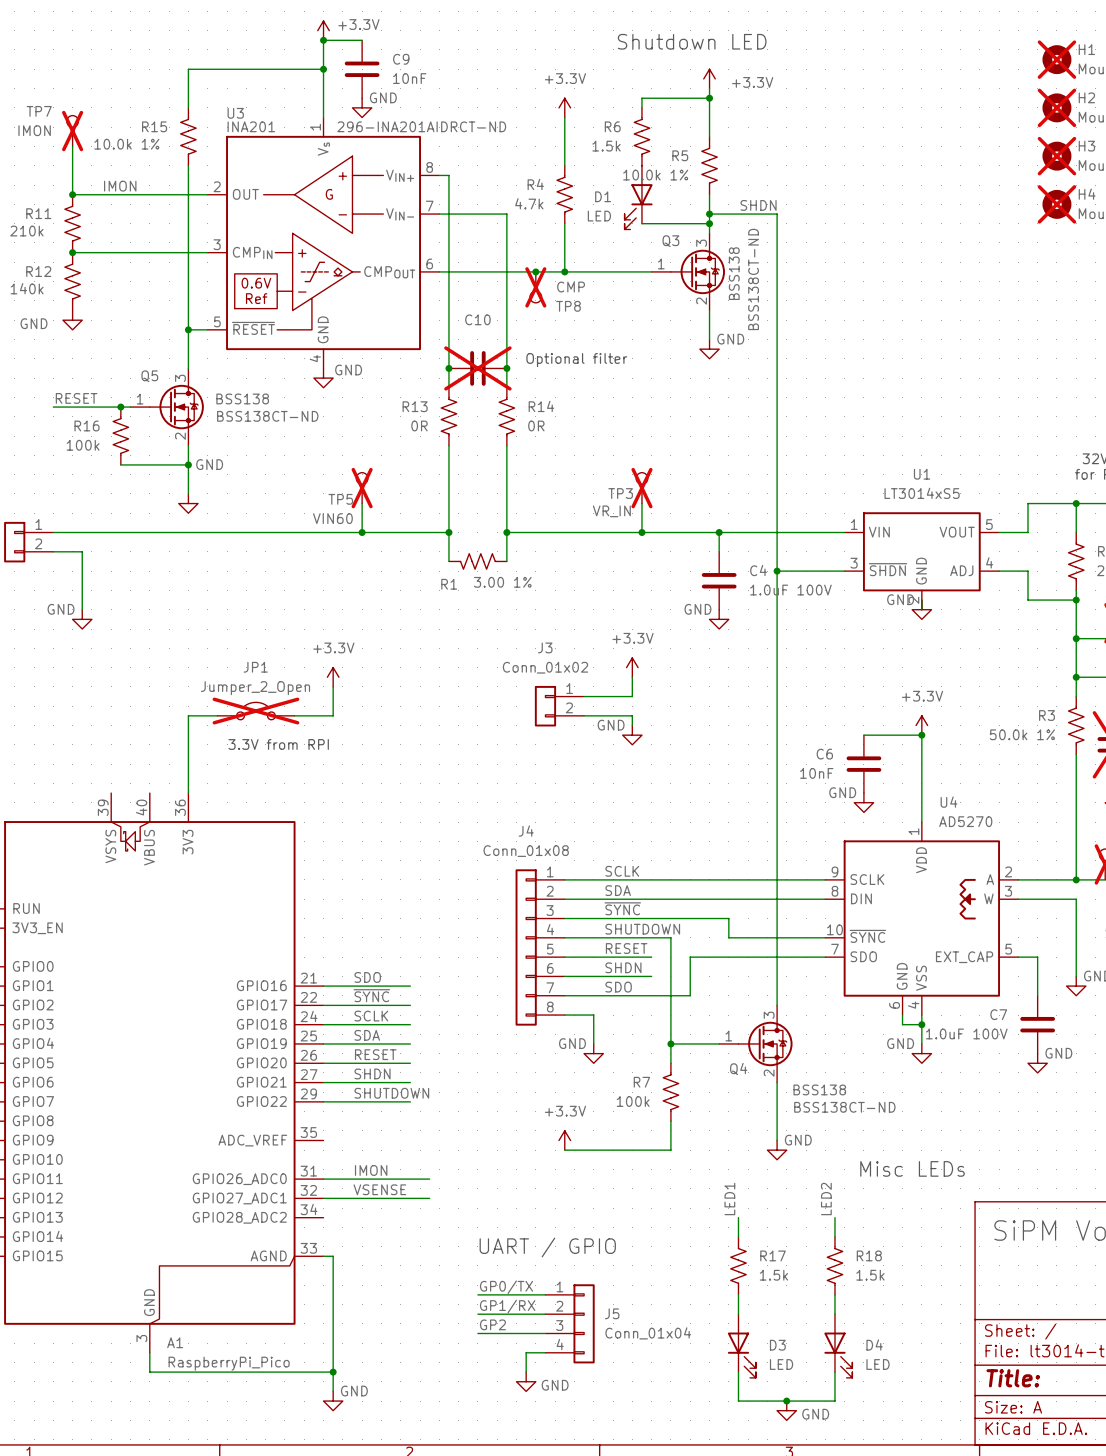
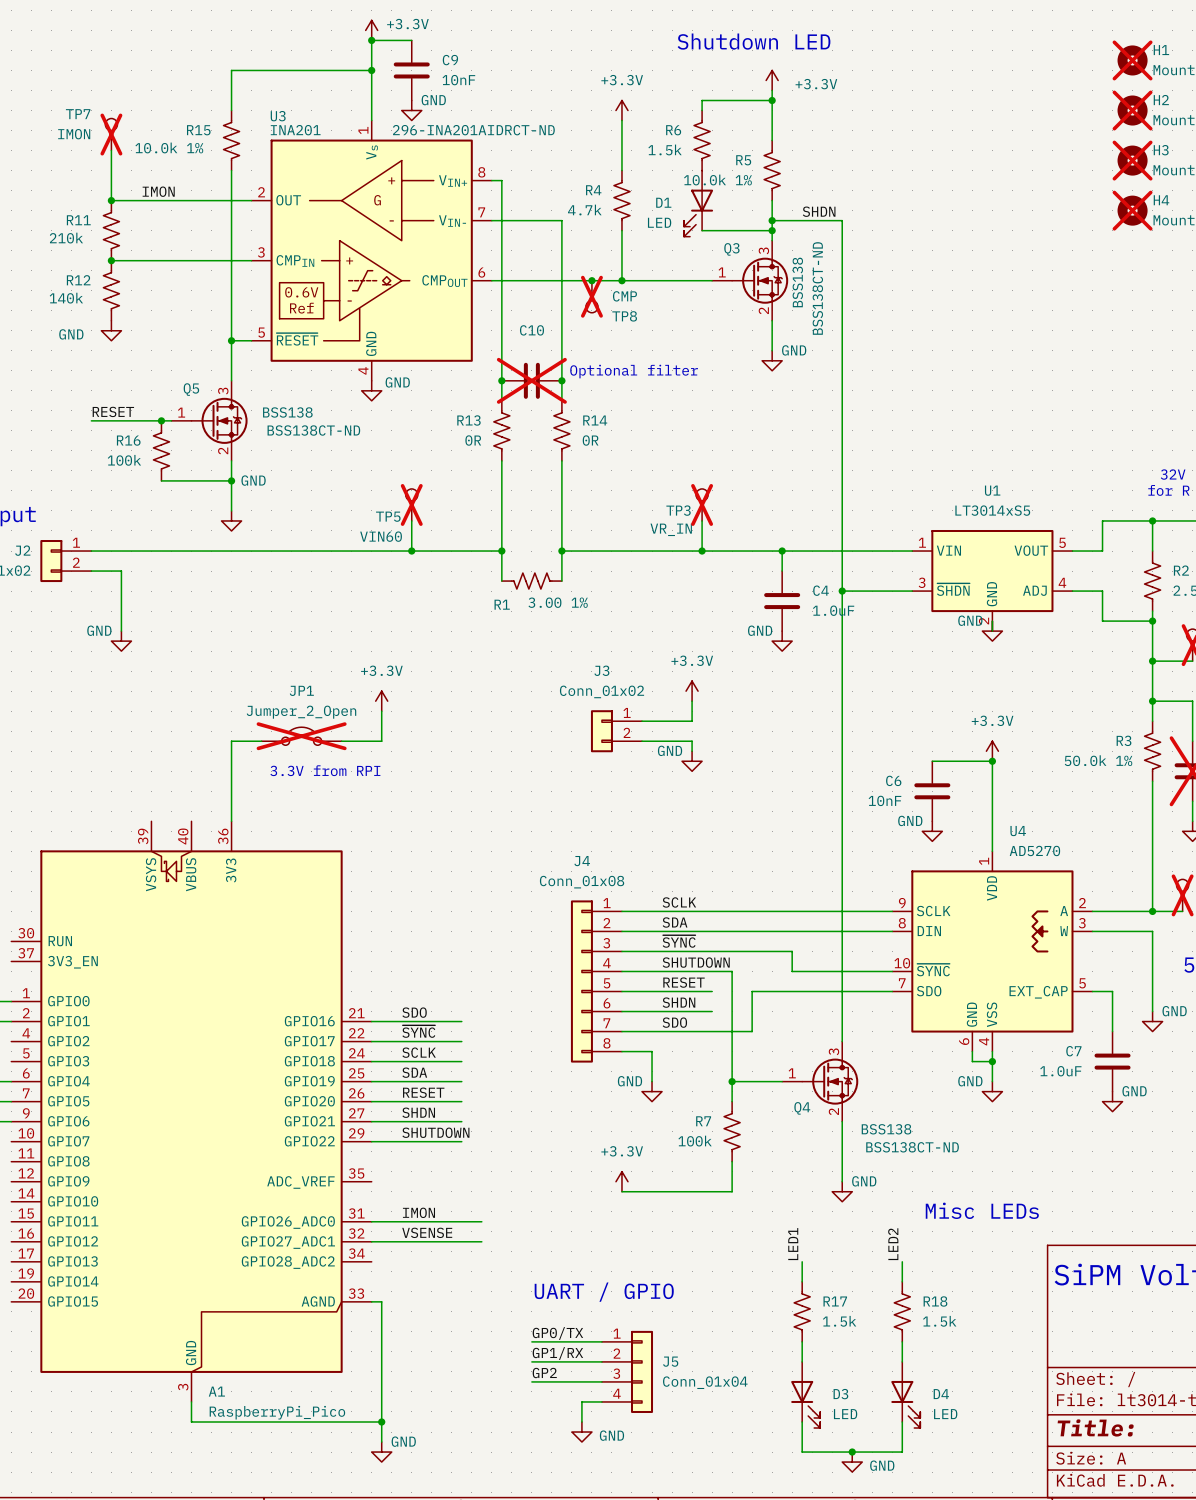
C4 value: 1.0uF 100V (790, 590) -> 1.0uF (833, 610)
C7 value: 1.0uF 100V (966, 1033) -> 1.0uF (1060, 1071)

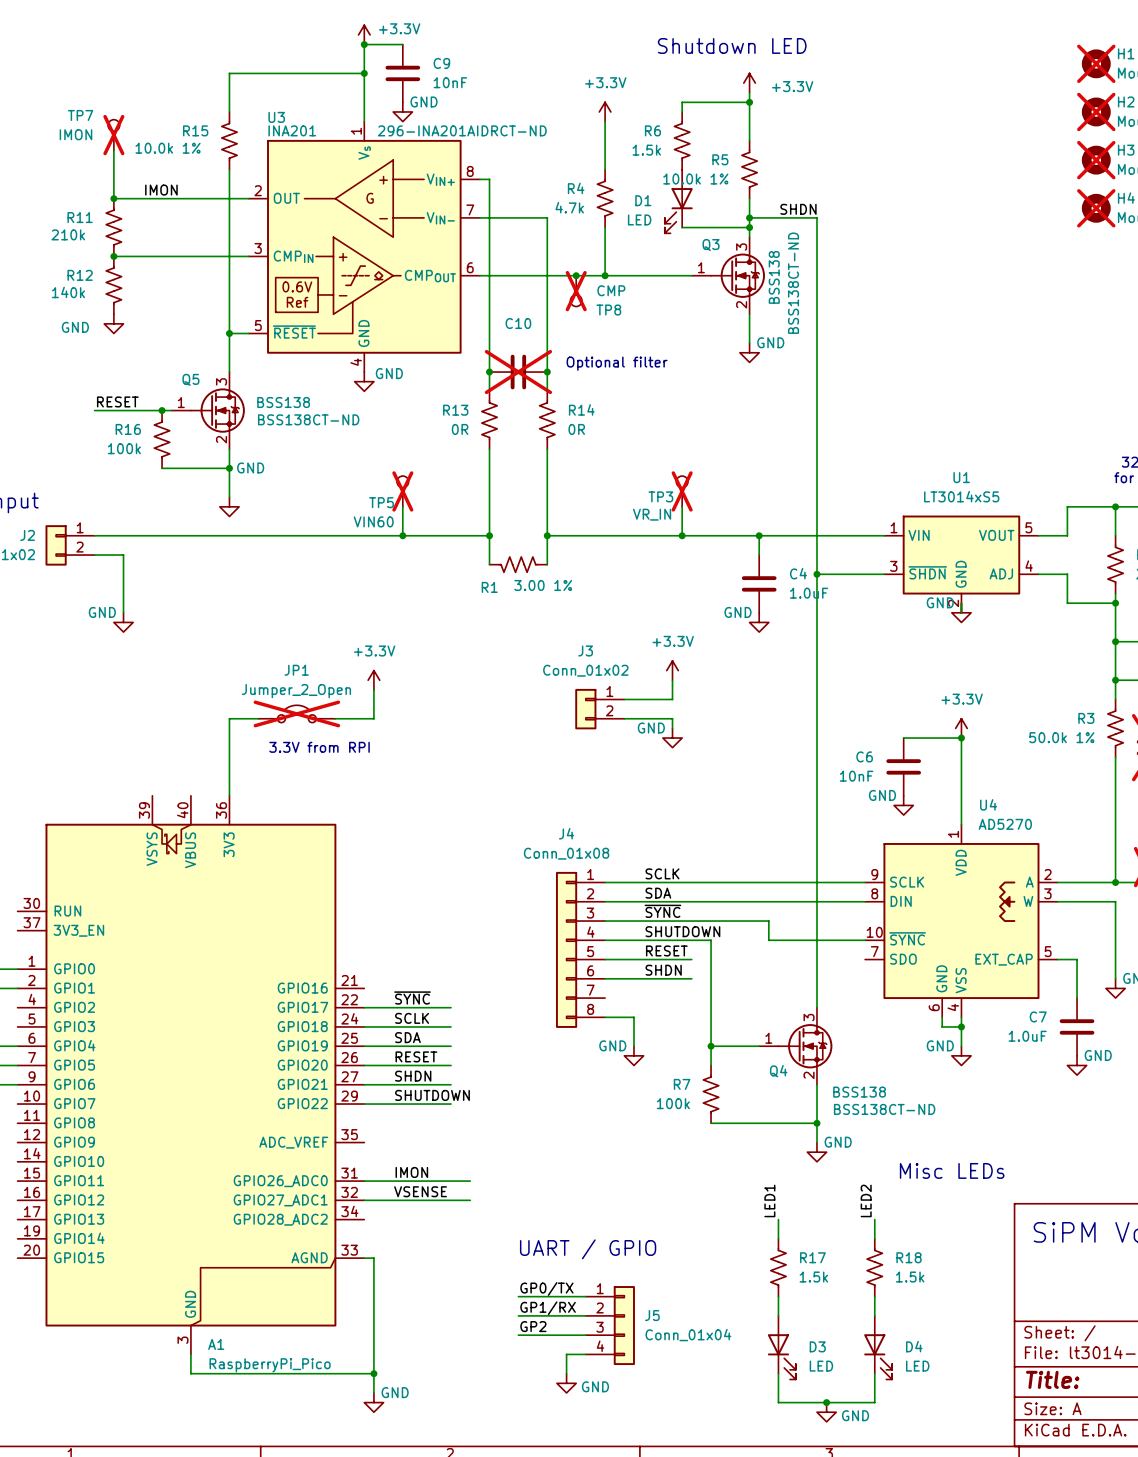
wire: (892, 991) (752, 991) (752, 1031) (621, 1031) -> none
label: SDO (414, 1012) -> none
wire: (371, 1021) (461, 1021) -> none
label: SDO (674, 1022) -> none
wire: (732, 1161) (732, 1191) (621, 1191) -> (711, 1123) (816, 1123)
junction: none -> (816, 1123)
power symbol: +3.3V (621, 1181) -> none

